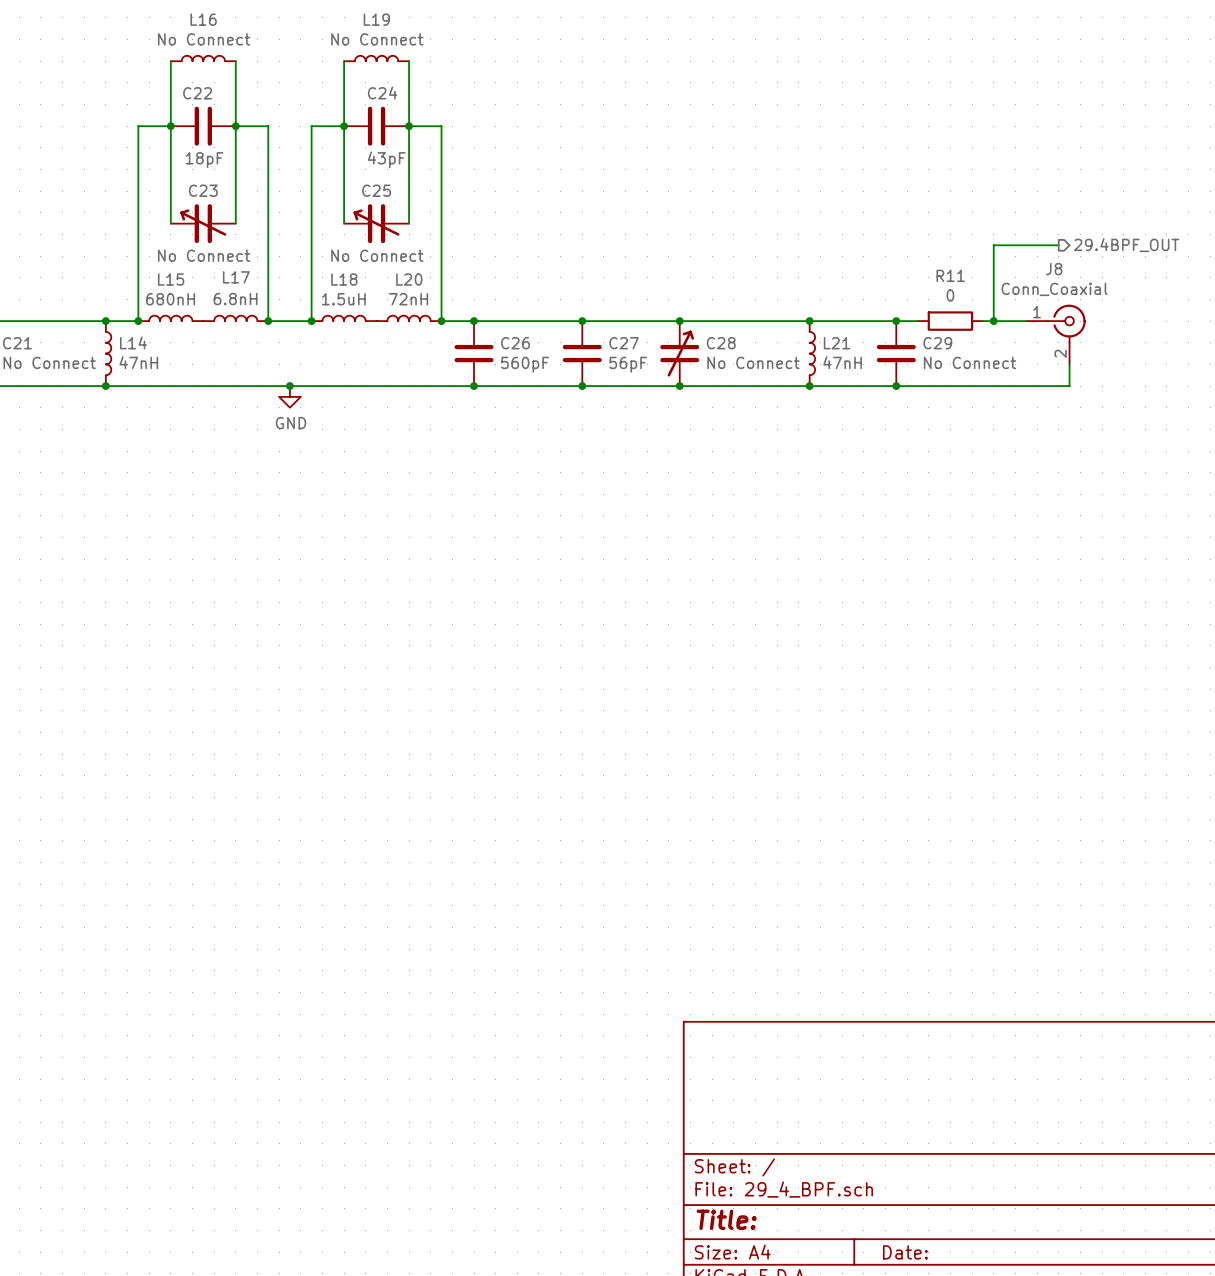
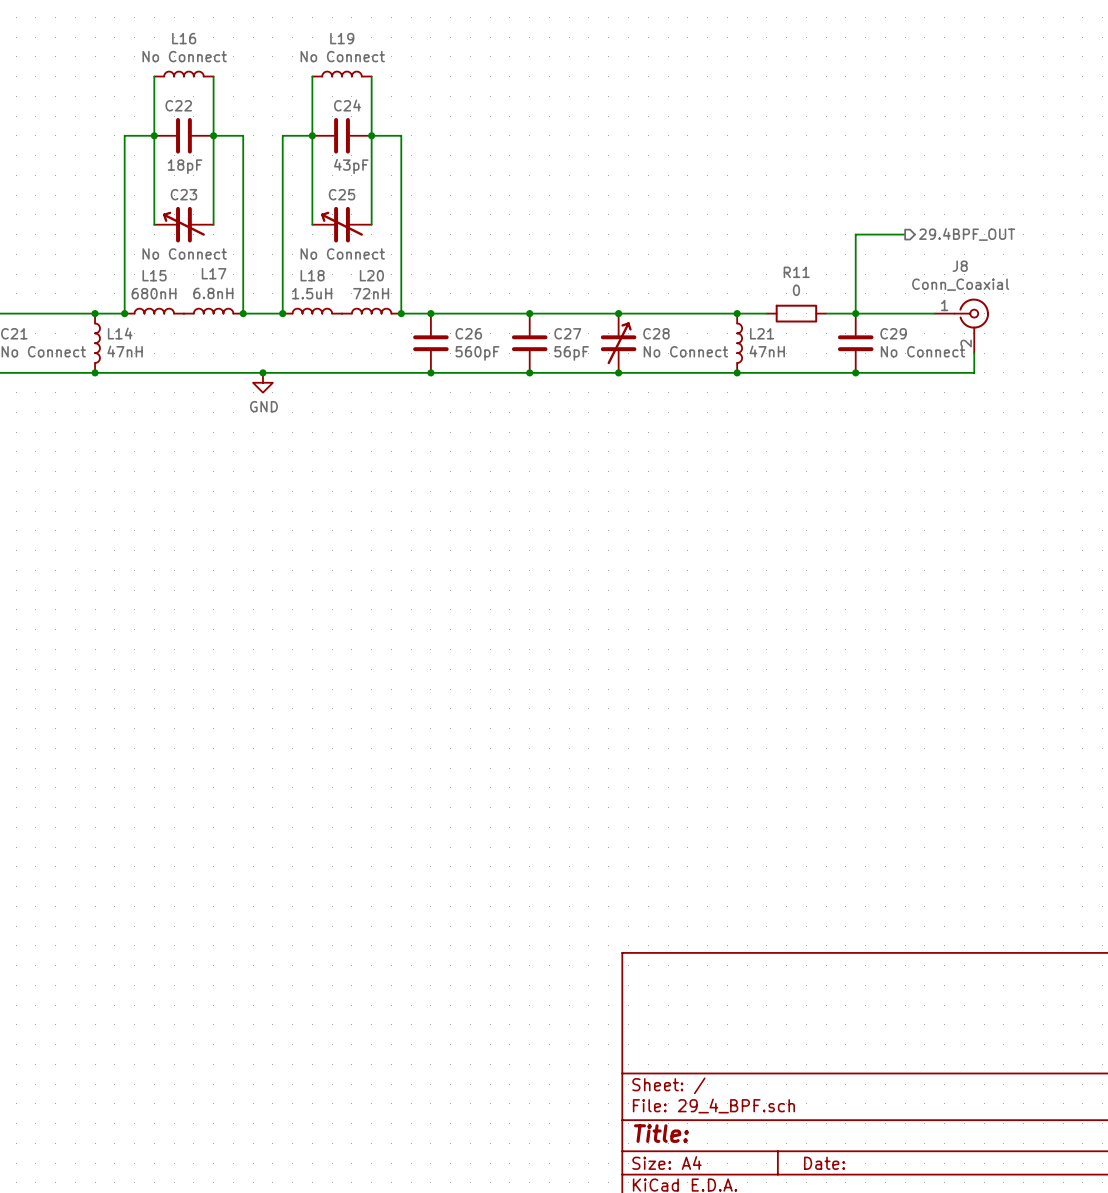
wire: none -> (905, 234) (855, 234) (855, 313)
wire: (1058, 245) (993, 245) (993, 321) -> none
hierarchical label position: 29.4BPF_OUT (1126, 245) -> 29.4BPF_OUT (967, 234)
wire: (842, 321) (907, 321) -> (835, 313) (895, 313)
junction: (896, 321) -> none
junction: none -> (855, 313)
R11 position: (950, 321) -> (796, 313)
junction: (993, 321) -> none
C29 position: (896, 353) -> (855, 343)
junction: (896, 386) -> none
junction: none -> (855, 372)

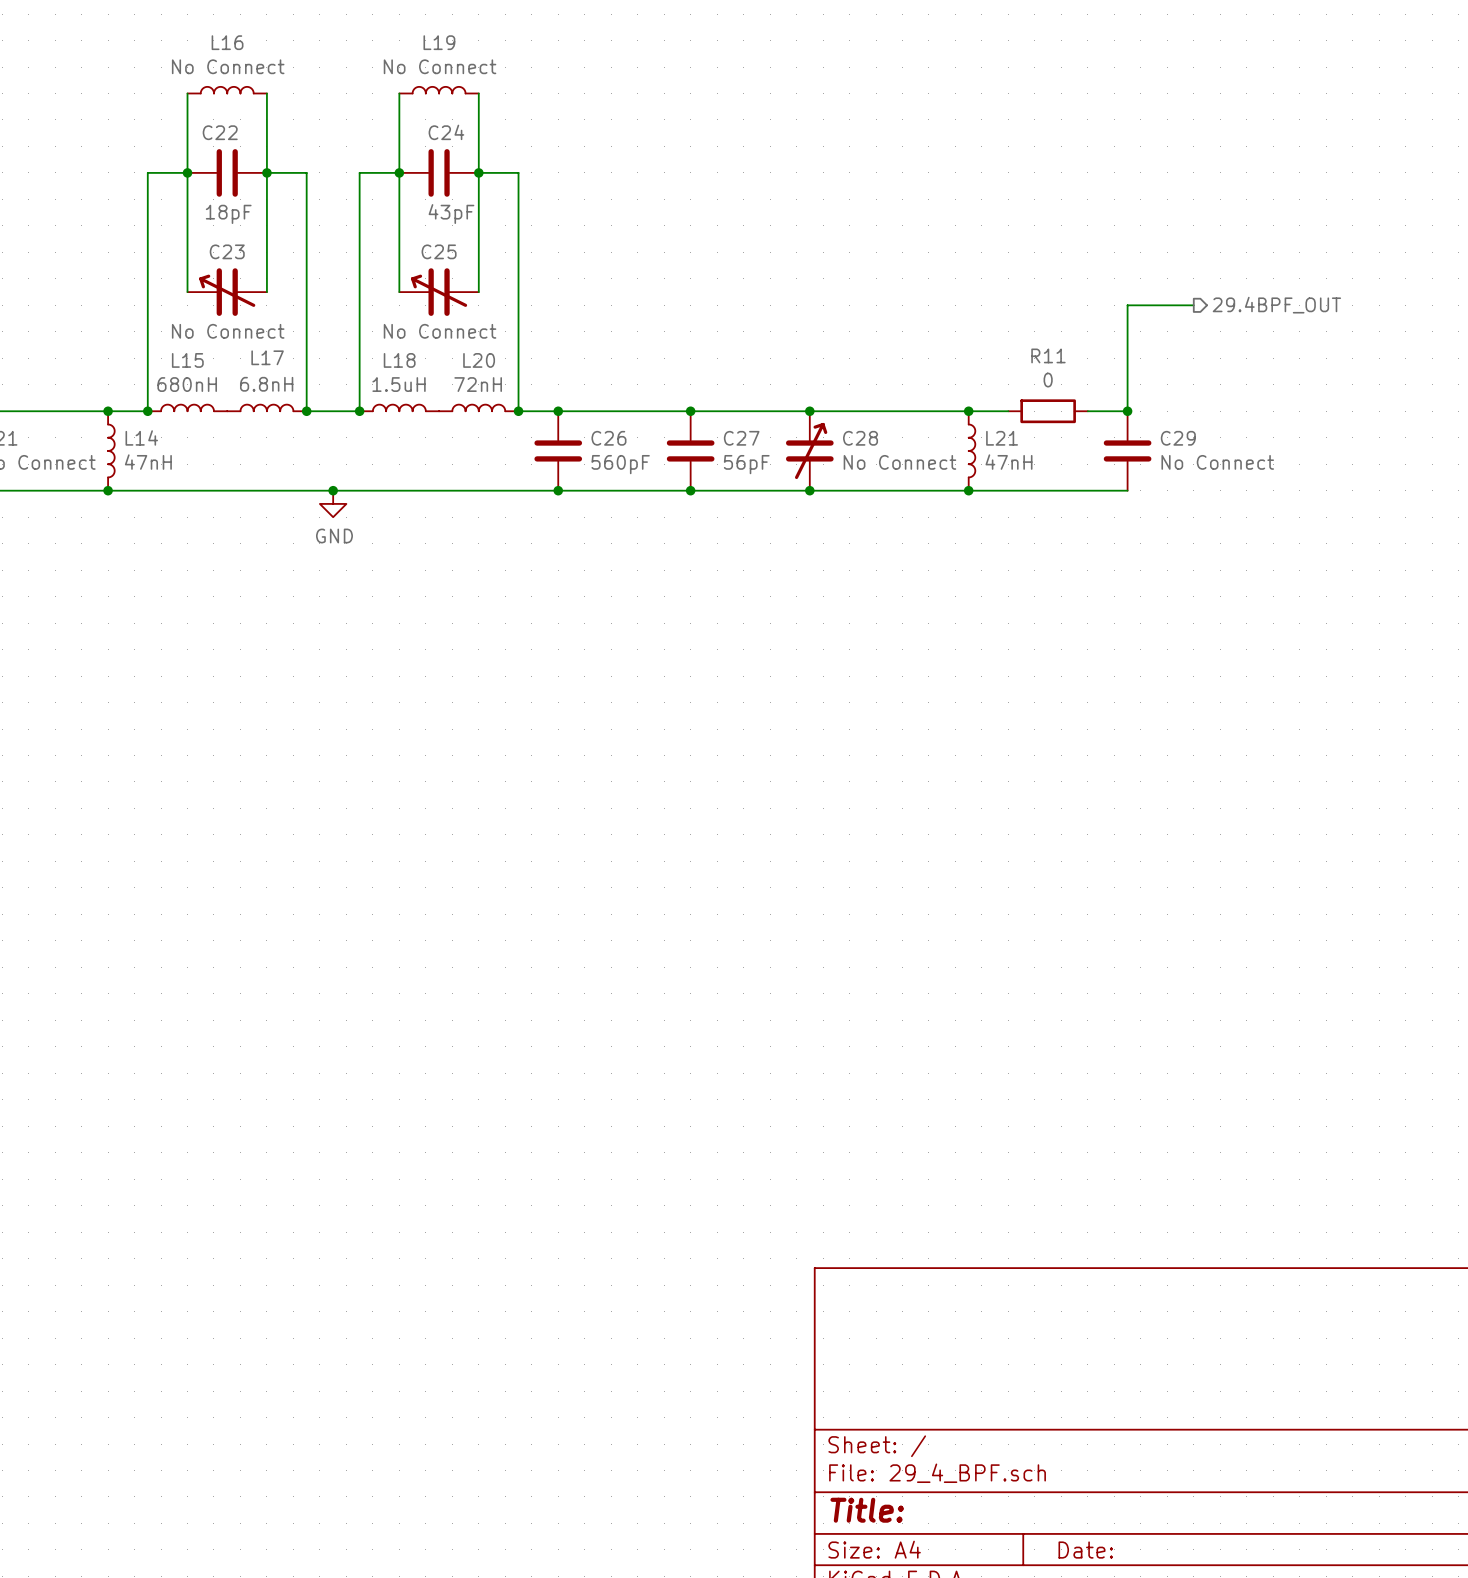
wire: (855, 313) (934, 313) -> none
J8: Conn_Coaxial (961, 325) -> none
wire: (974, 353) (974, 372) (855, 372) -> none
junction: (855, 372) -> none

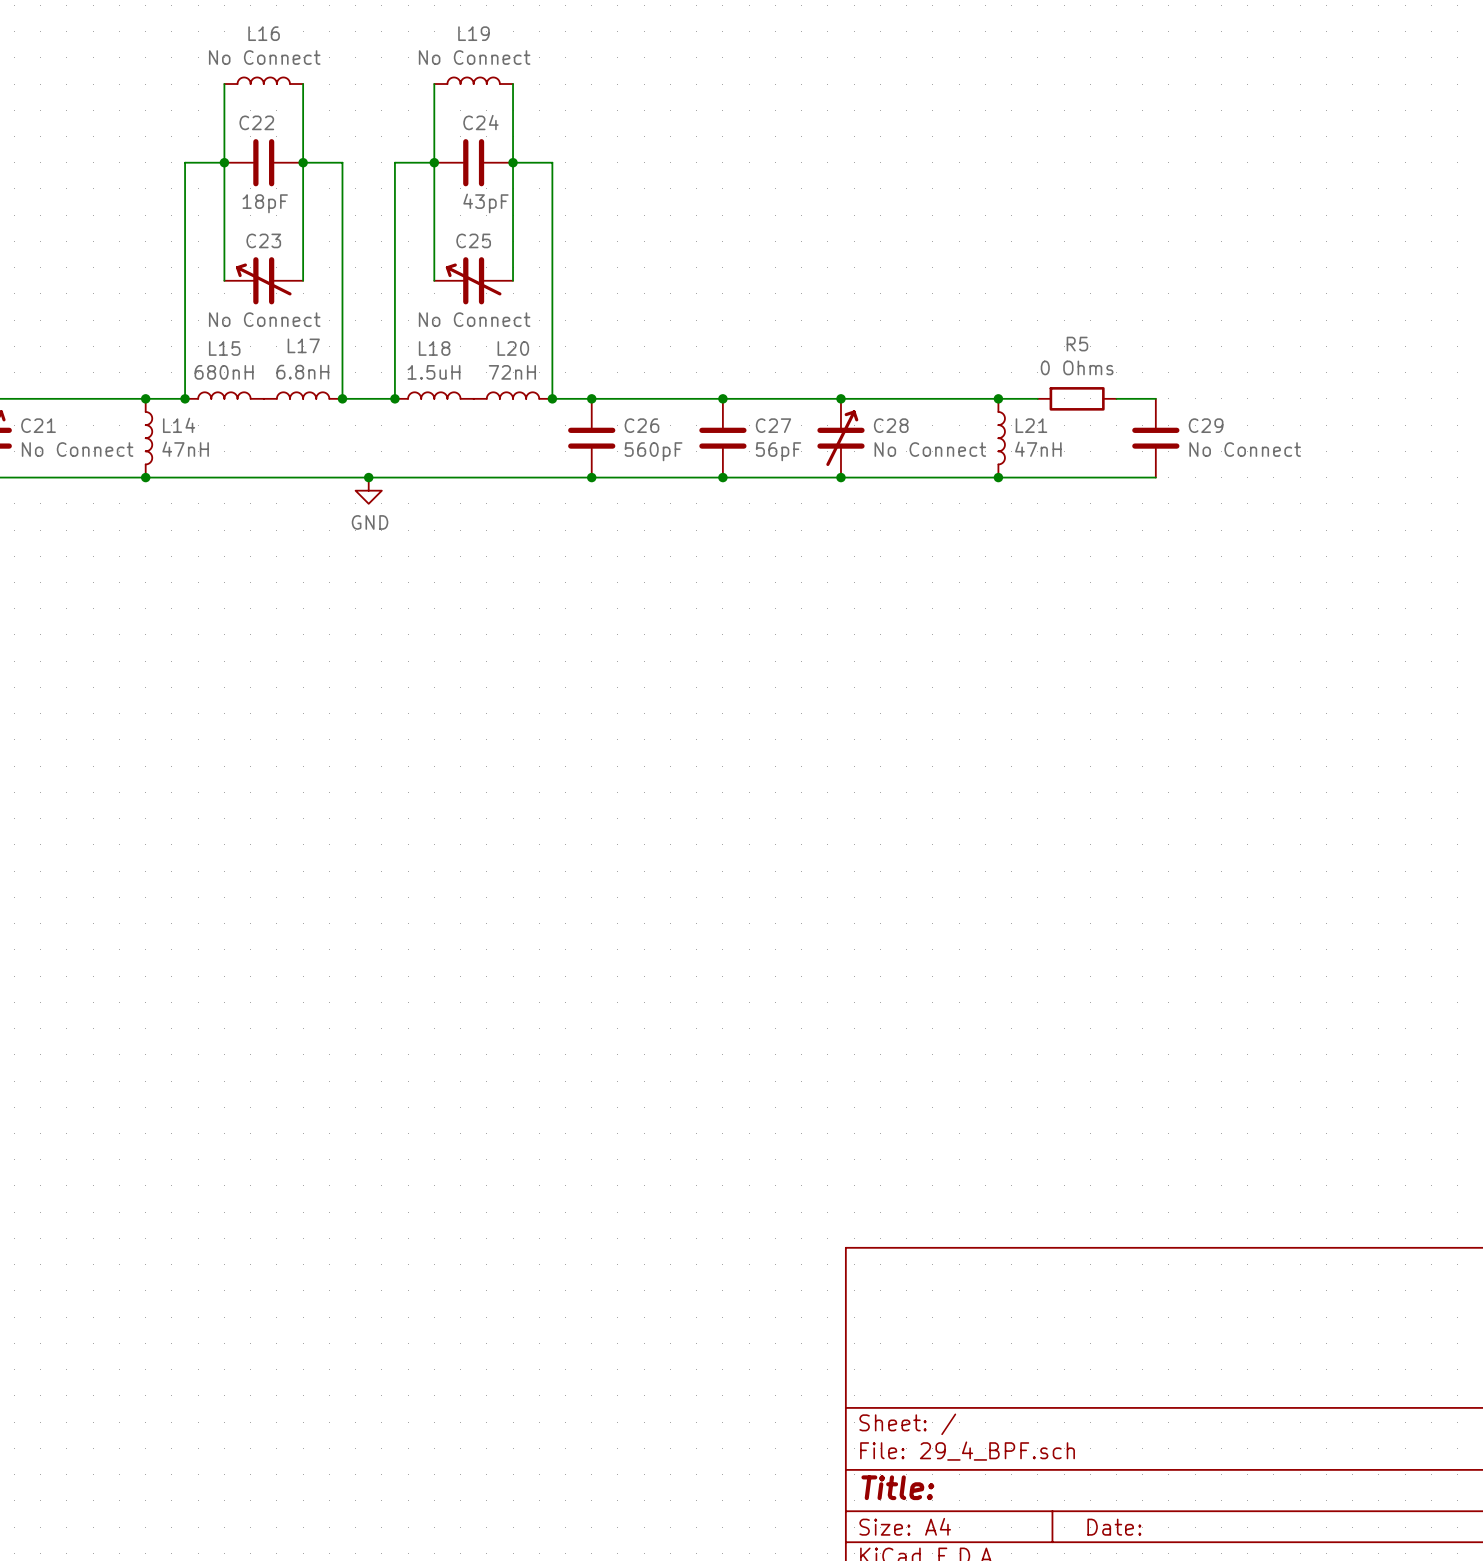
wire: (1193, 305) (1127, 305) (1127, 411) -> none
hierarchical label: 29.4BPF_OUT (1276, 305) -> none
R11 name: R11 (1048, 355) -> R5 (1077, 344)
R11 value: 0 (1048, 380) -> 0 Ohms (1077, 367)
junction: (1127, 411) -> none

